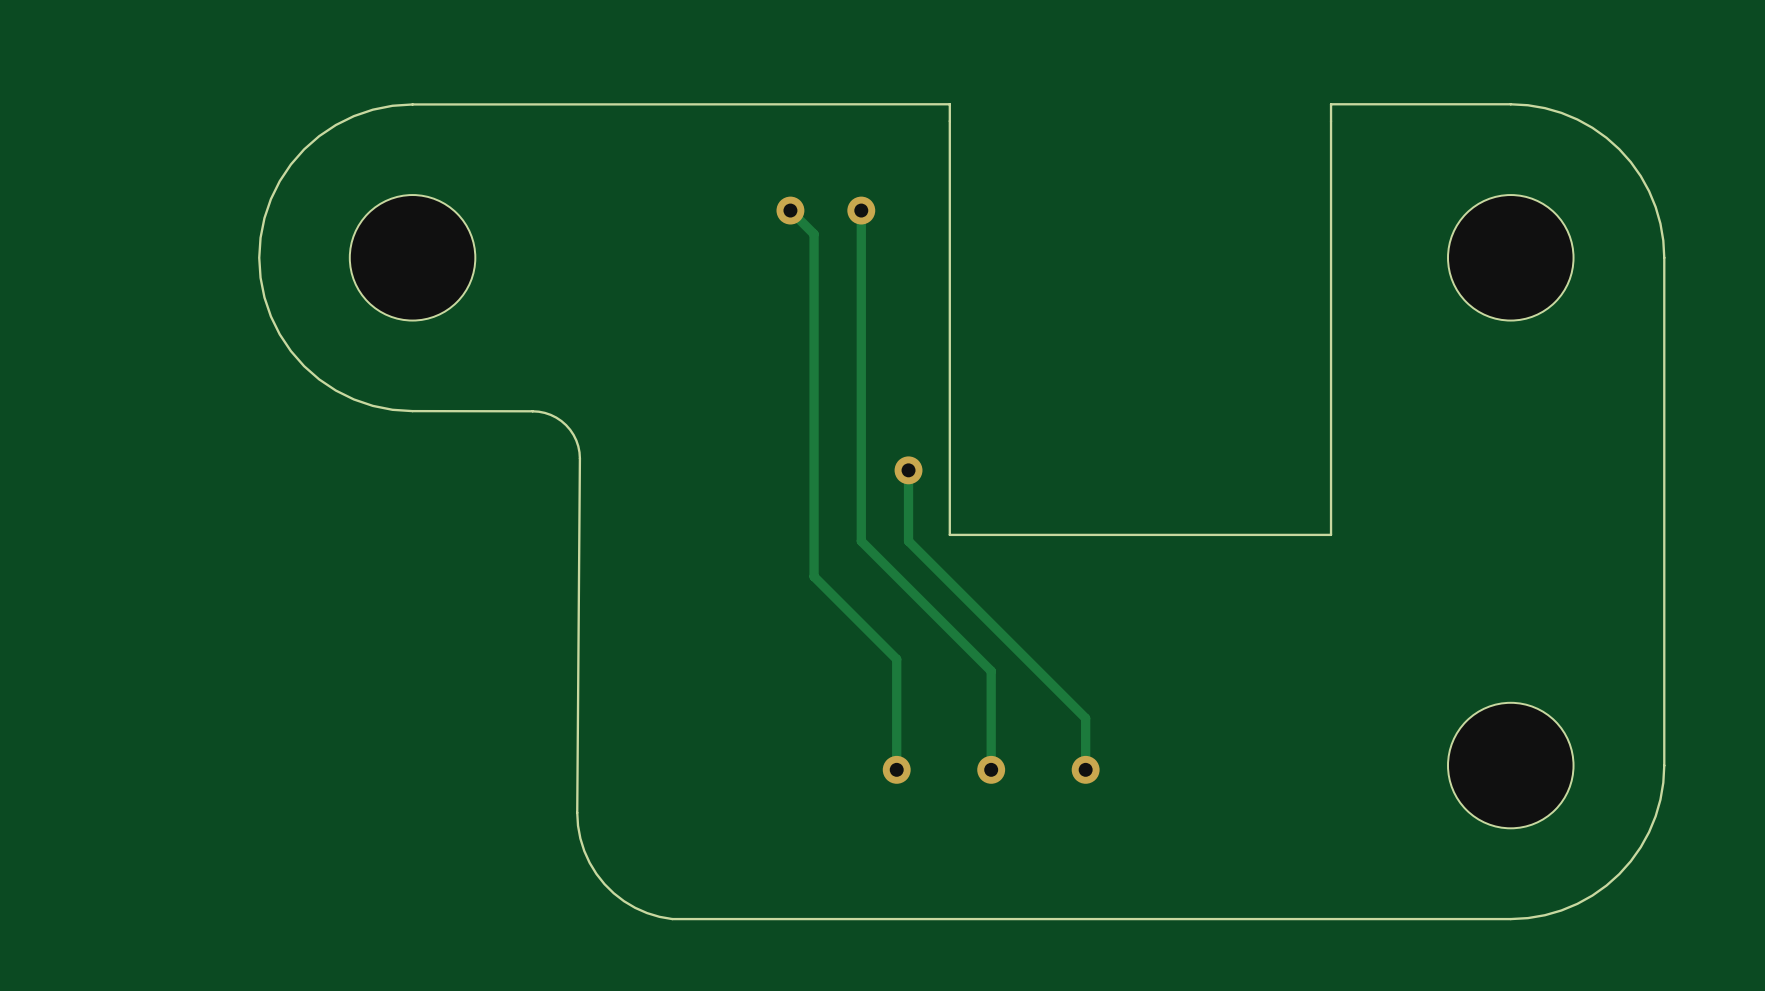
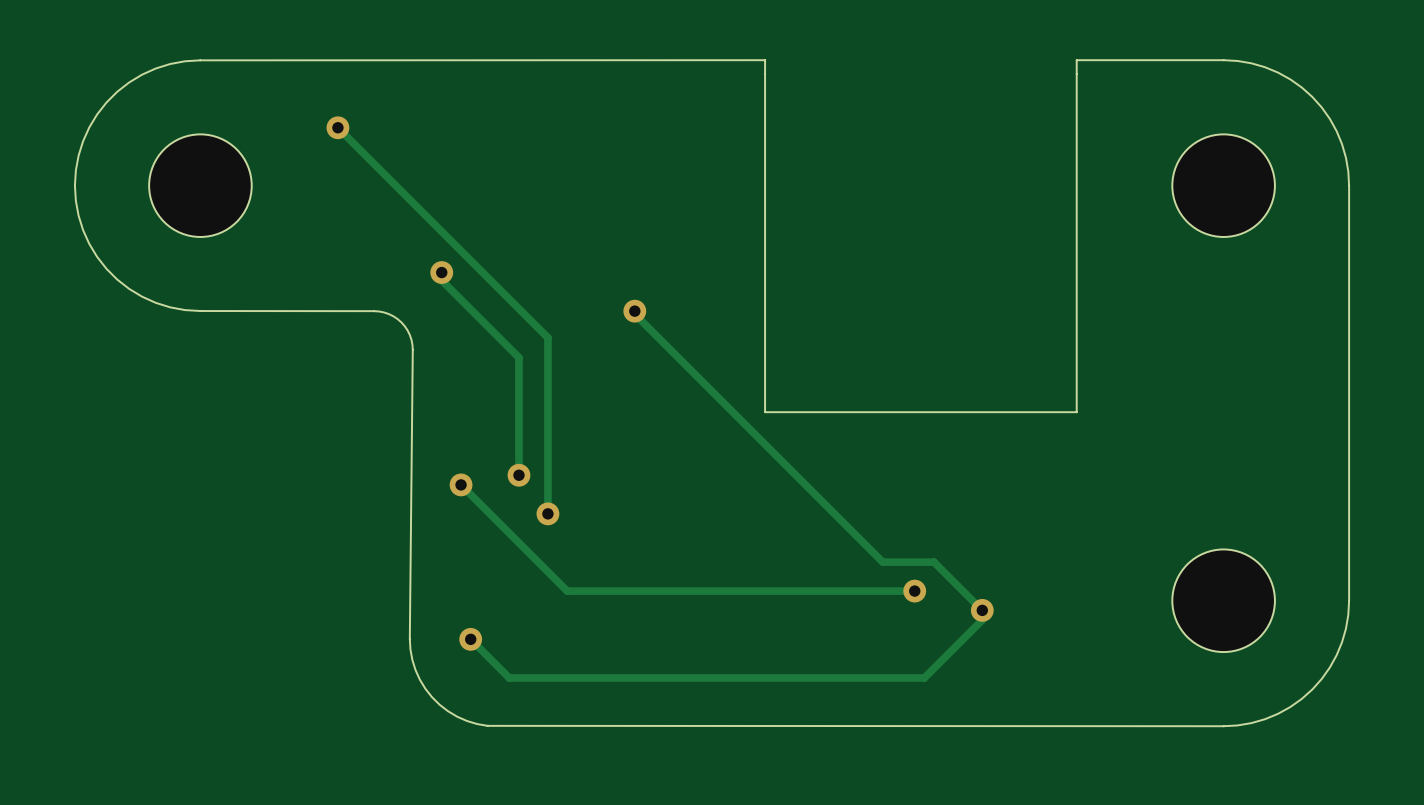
board edge: (949, 104) (392, 105) (353, 116) (319, 136) (290, 164) (270, 199) (264, 218) (259, 257) (264, 297) (270, 316) (290, 351) (319, 379) (353, 399) (392, 409) (544, 412) (561, 421) (570, 429) (576, 440) (579, 458) (577, 812) (580, 838) (589, 862) (596, 873) (613, 893) (635, 907) (647, 913) (672, 919) (1510, 919) -> (765, 60) (200, 60) (170, 63) (142, 74) (129, 82) (117, 91) (97, 114) (83, 141) (78, 155) (74, 185) (78, 215) (89, 243) (106, 268) (129, 288) (155, 302) (185, 310) (200, 311) (379, 311) (393, 316) (404, 326) (409, 334) (412, 349) (410, 649) (415, 670) (425, 688) (439, 704) (457, 716) (487, 725) (1223, 726)
track: none -> (337, 127) (547, 337) (547, 513)
via: none -> (337, 127)
track: (790, 210) (814, 234) (814, 576) (896, 659) (896, 769) -> none
via: (790, 210) -> none
track: (861, 210) (861, 541) (991, 671) (991, 769) -> none
via: (861, 210) -> none
part position: (412, 257) -> (200, 185)
track: none -> (441, 272) (441, 280) (518, 357) (518, 475)
via: none -> (441, 272)
track: none -> (634, 311) (634, 314) (882, 562) (934, 562) (982, 610) (982, 620) (924, 677) (509, 677) (470, 639)
via: none -> (634, 311)
track: (908, 470) (908, 541) (1085, 718) (1085, 769) -> none
via: (908, 470) -> none
via: none -> (518, 475)
track: none -> (461, 484) (567, 591) (914, 591)
via: none -> (461, 484)
via: none -> (547, 513)
via: (896, 769) -> none
via: (991, 769) -> none
via position: (1085, 769) -> (914, 591)
via: none -> (982, 610)
via: none -> (470, 639)

